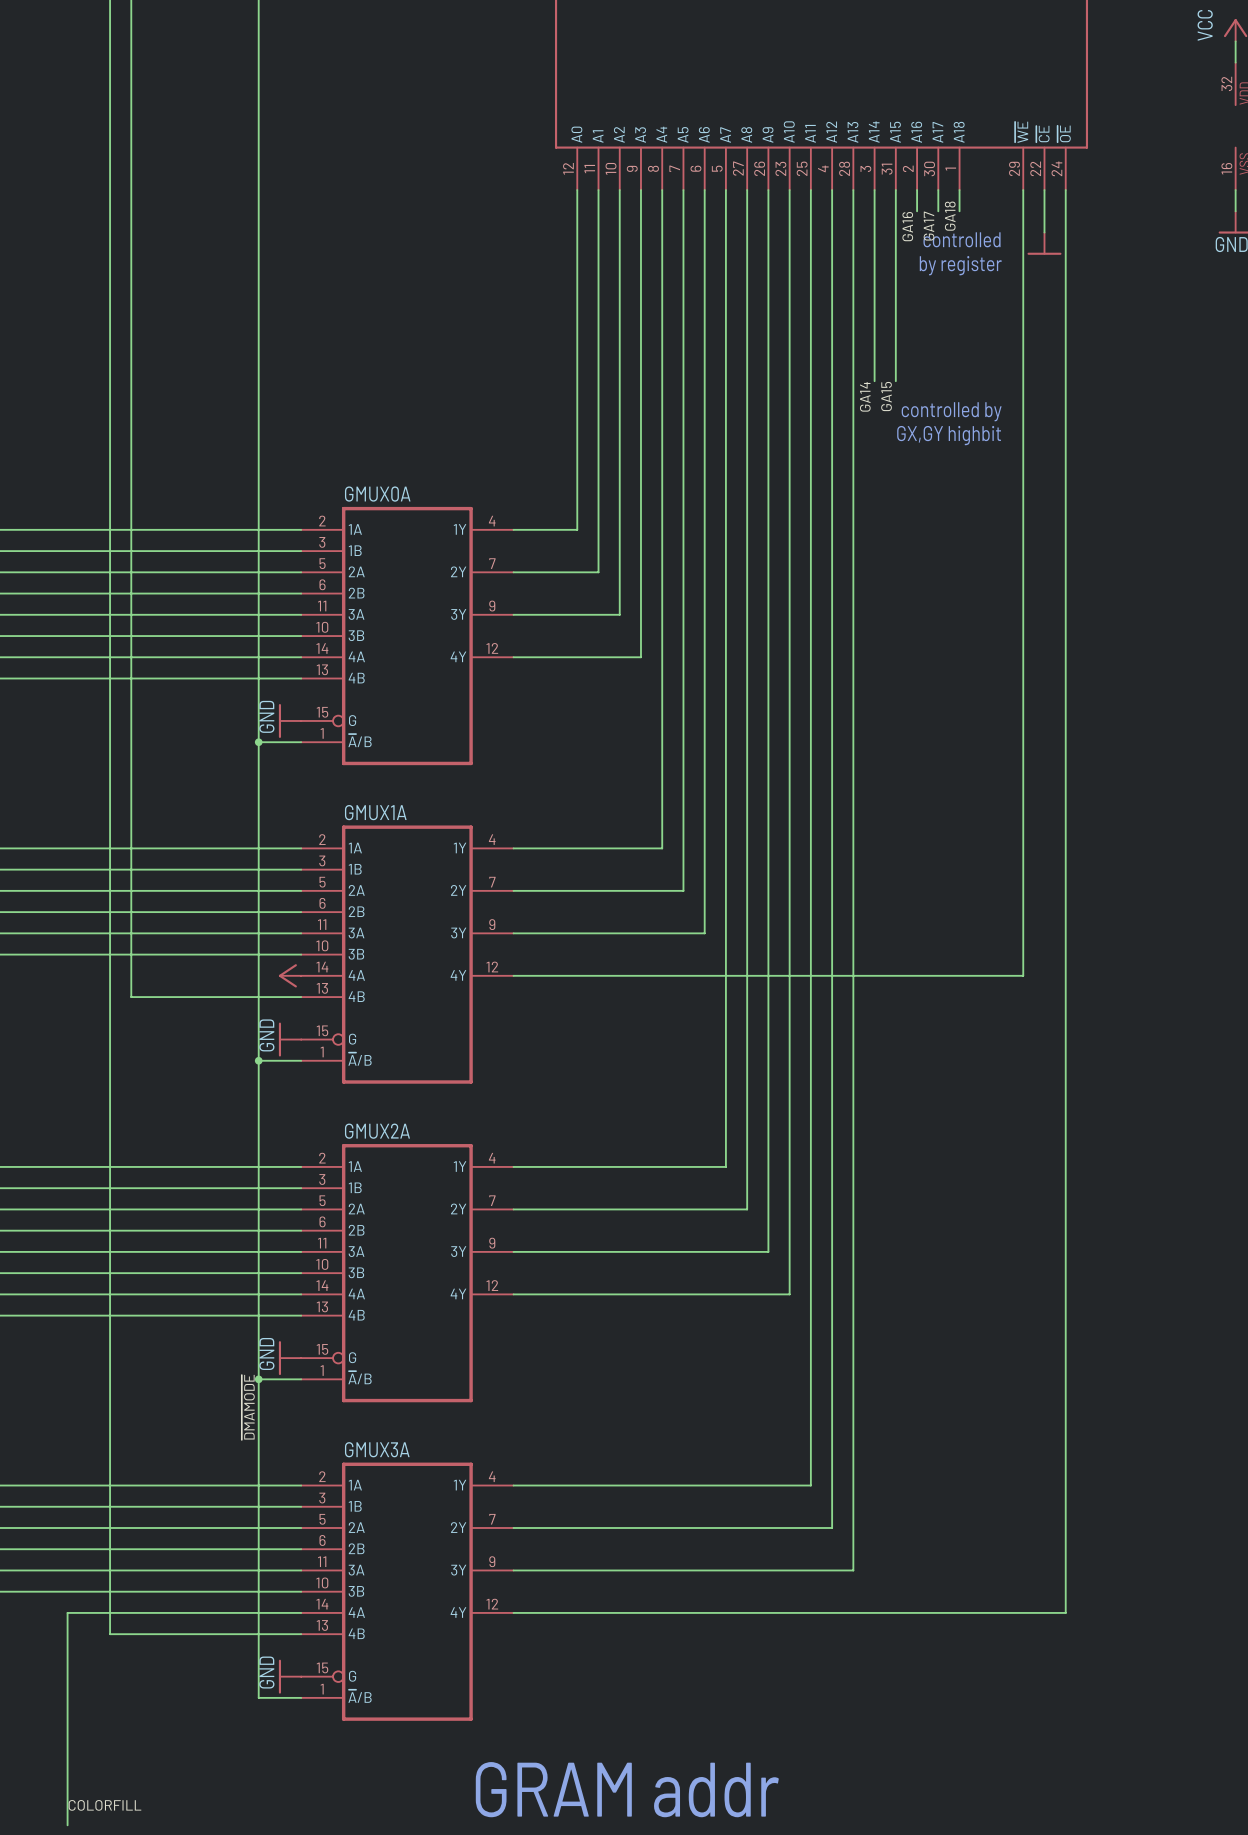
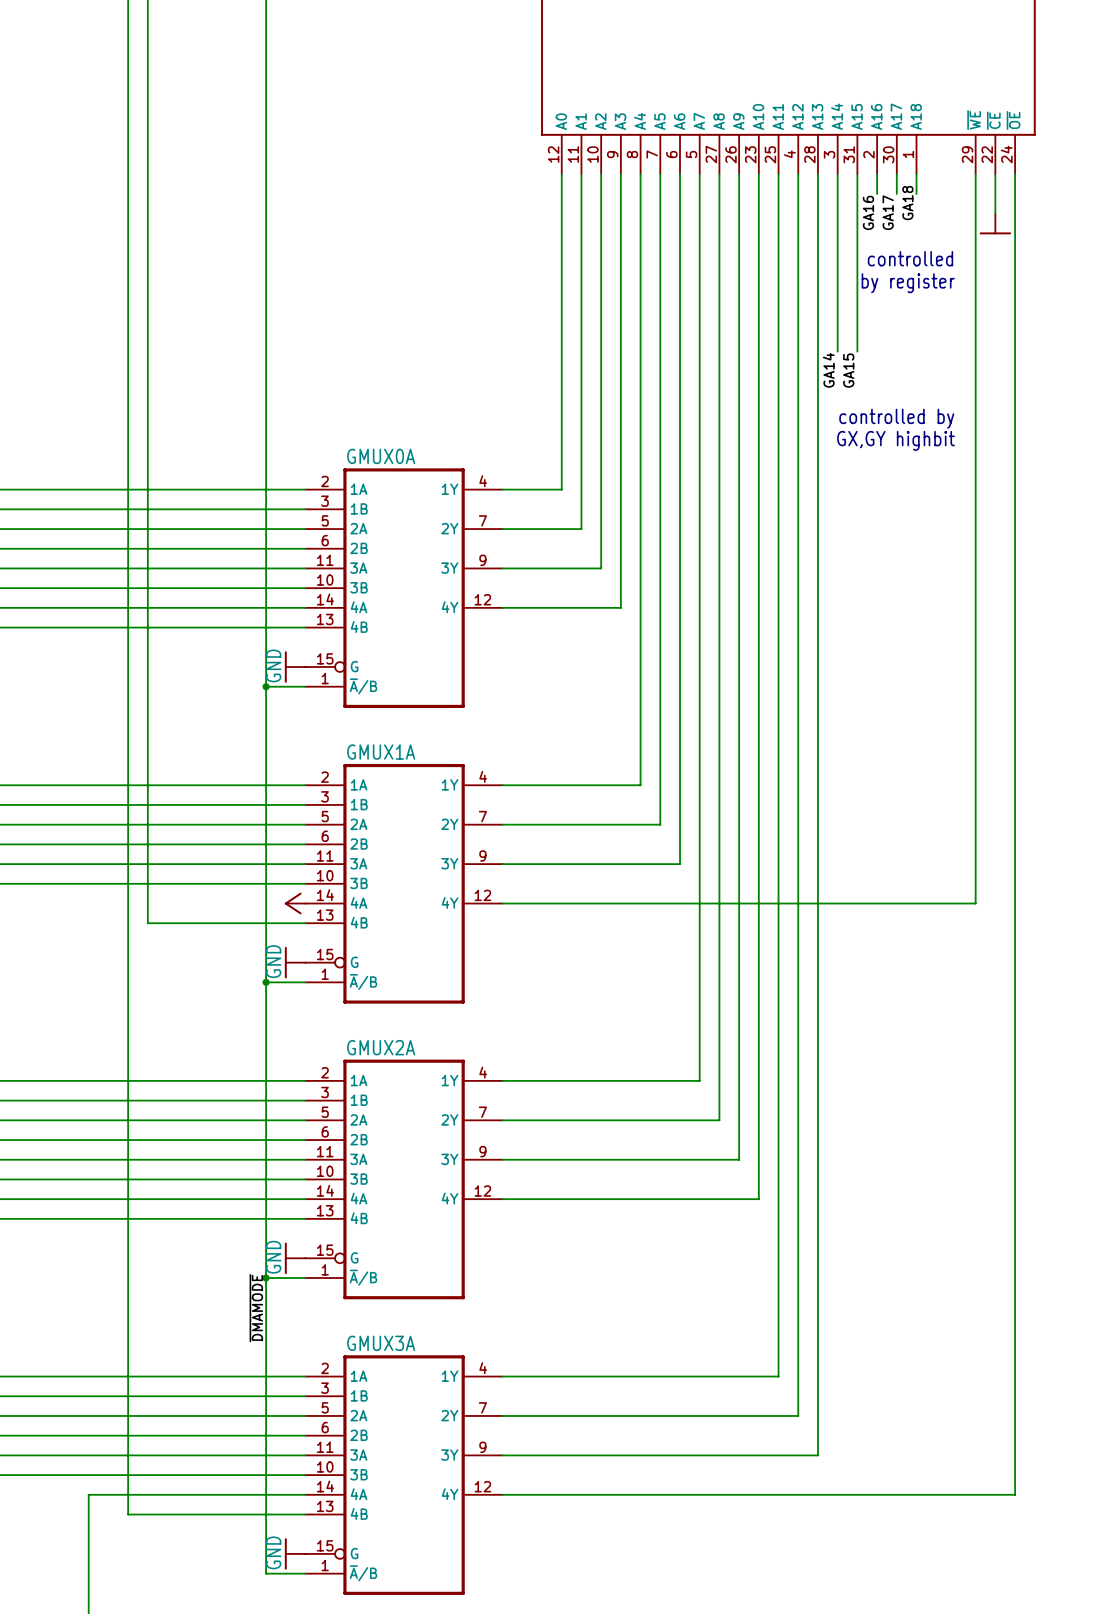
text: controlled (962, 239) -> none
text: by register (960, 265) -> controlled (910, 258)
text: none -> by register (908, 283)
text: controlled by (951, 411) -> none
text: GX,GY highbit (949, 435) -> controlled by (896, 418)
text: none -> GX,GY highbit (895, 440)

